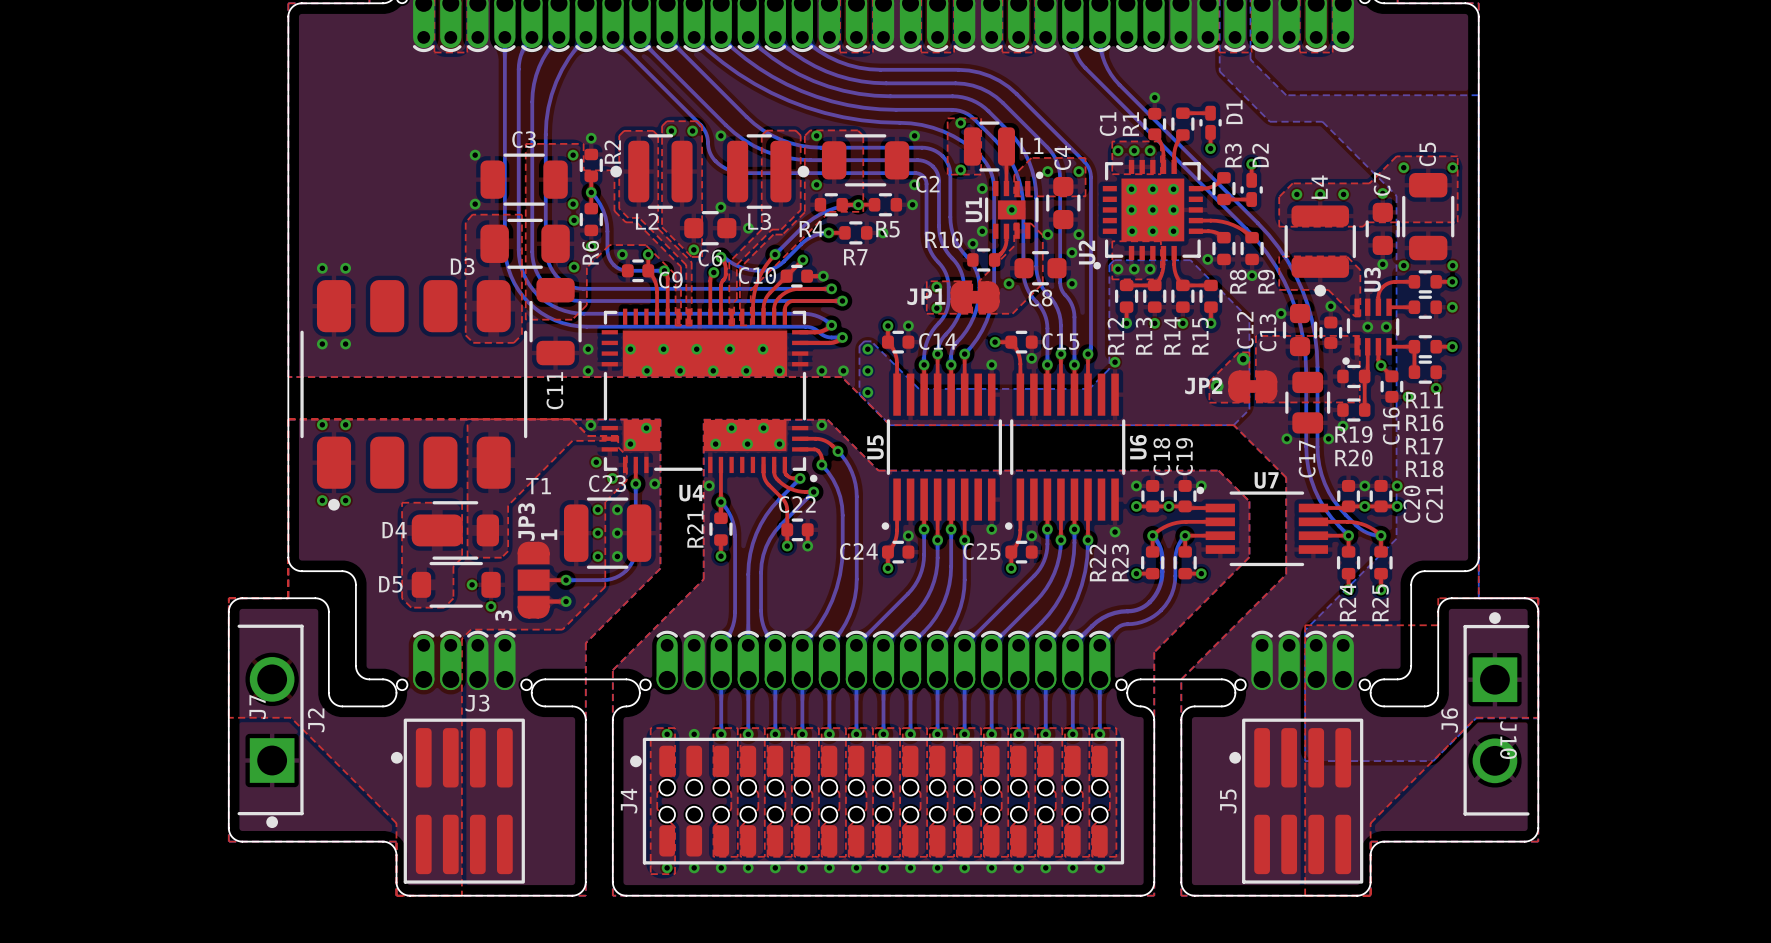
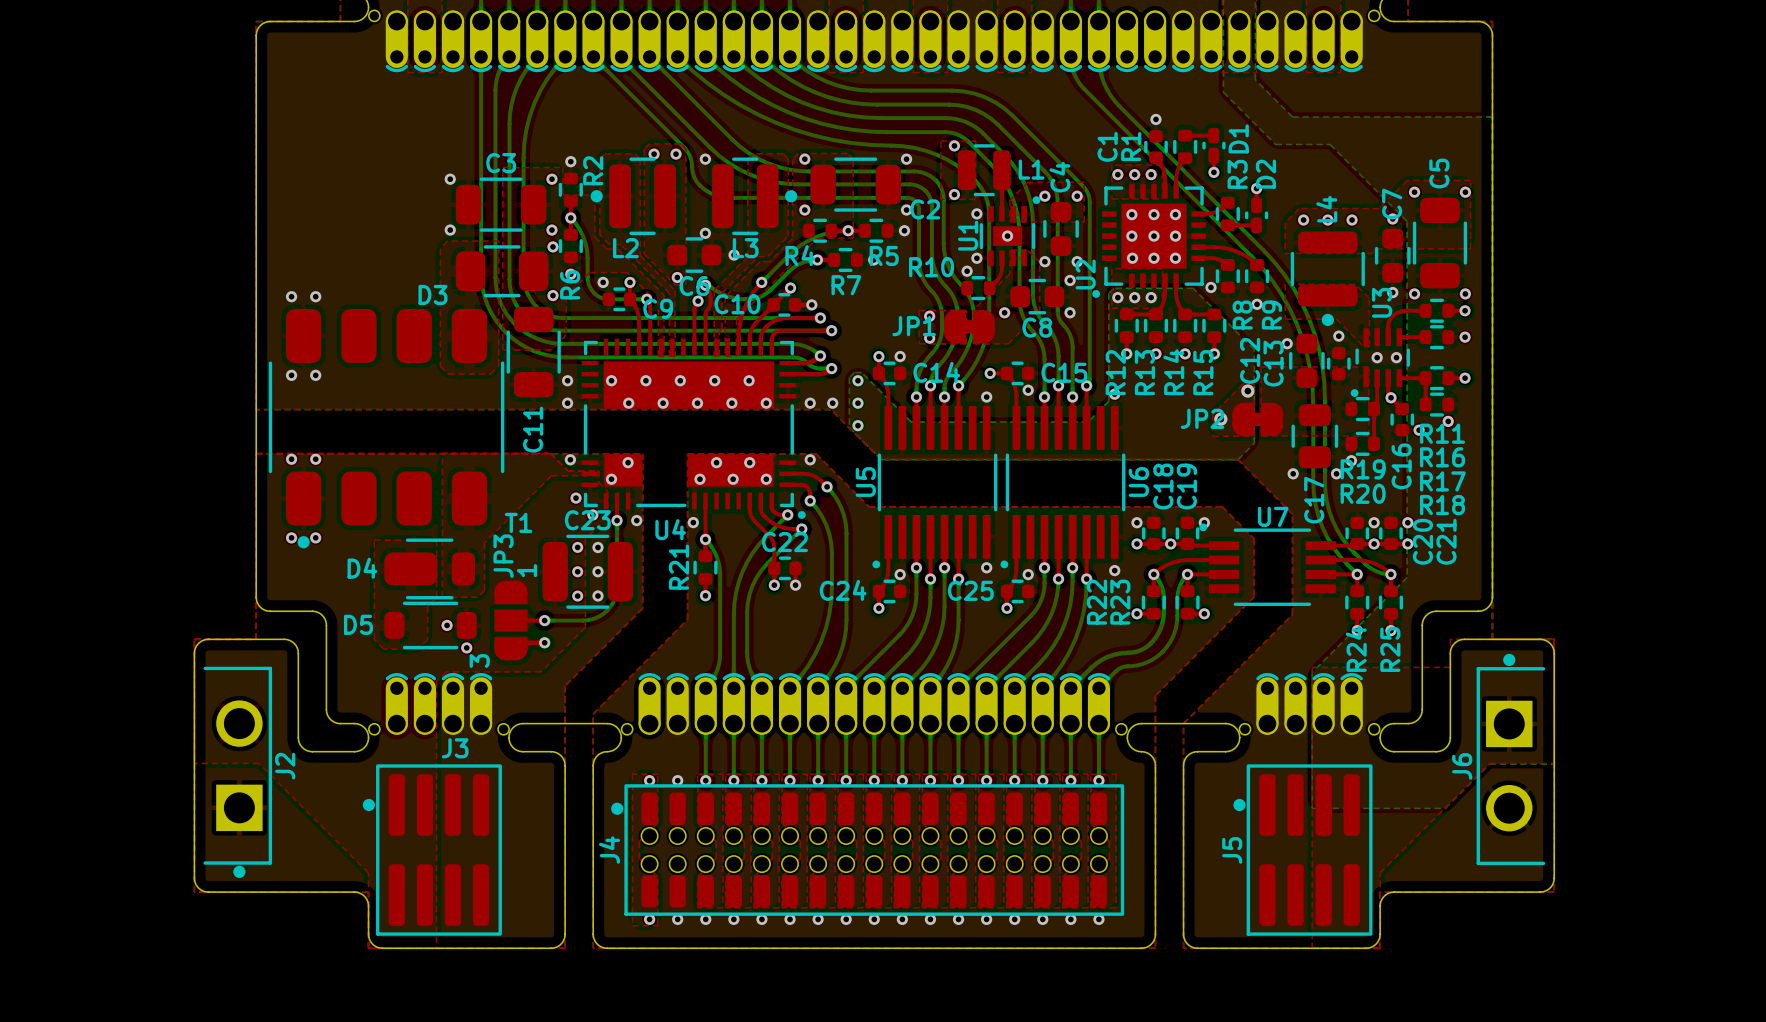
J7: (257, 707) -> none
J10: (1508, 740) -> none

